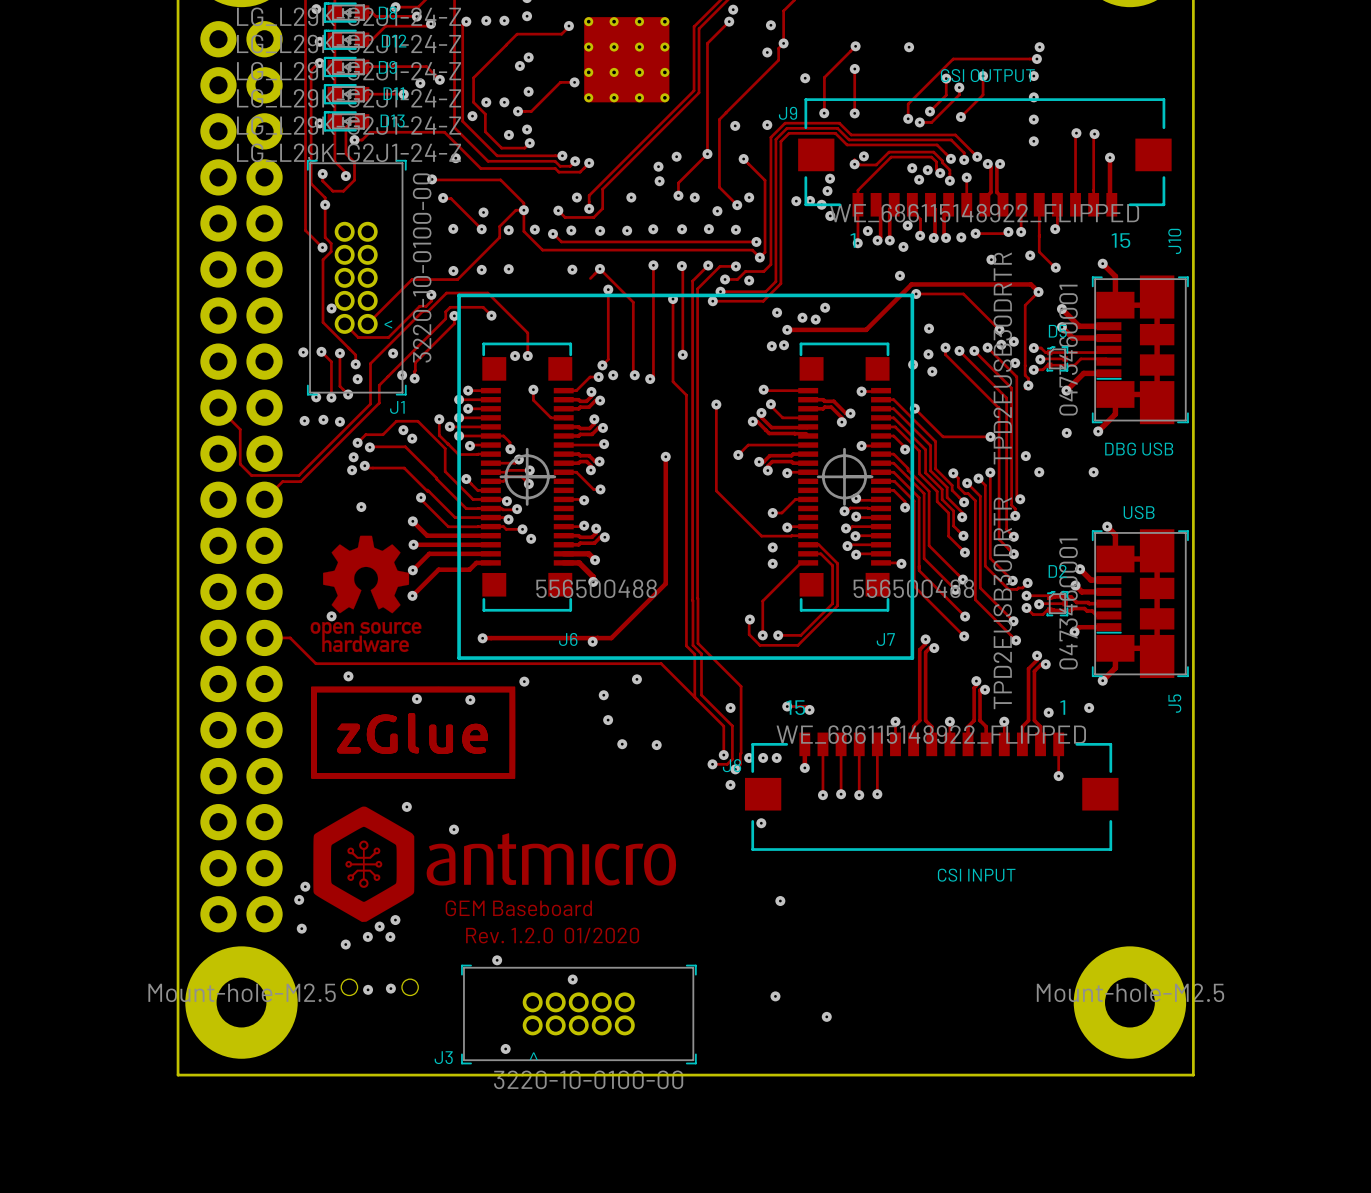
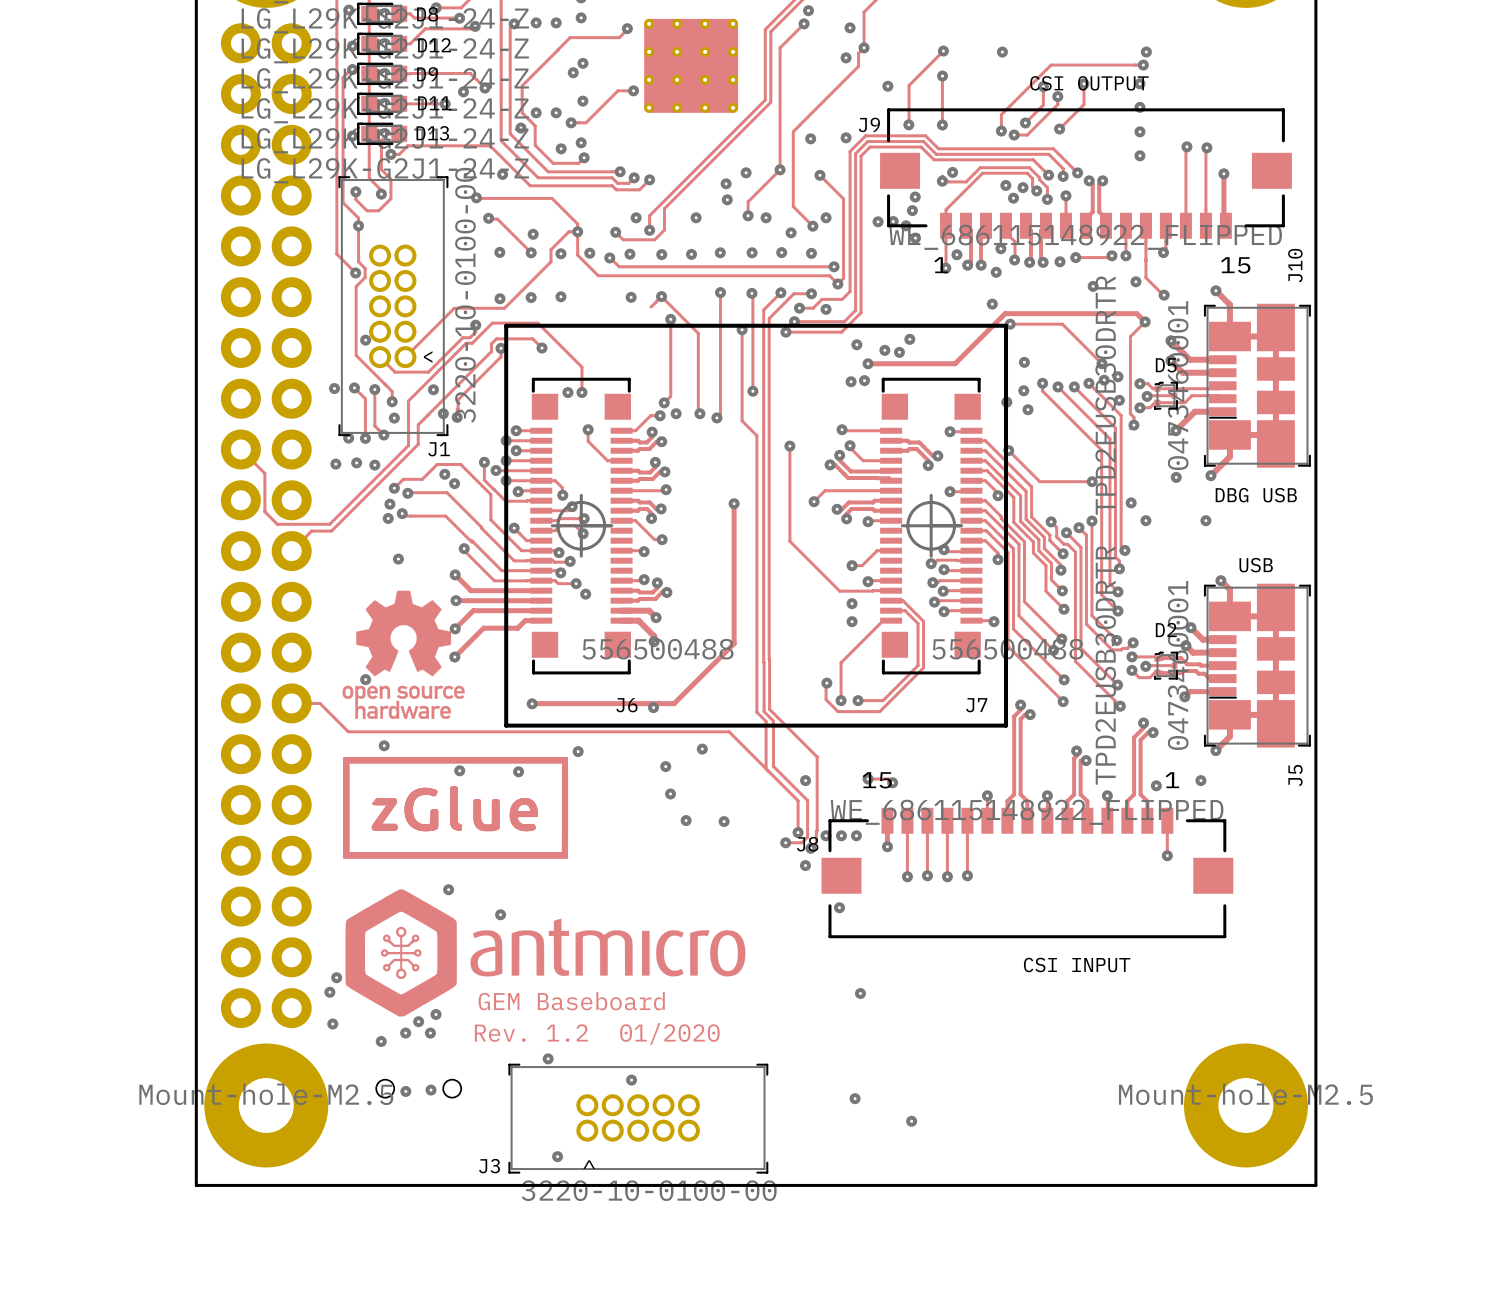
text: Rev. 1.2.0 01/2020 (552, 935) -> Rev. 1.2 01/2020 (597, 1033)

